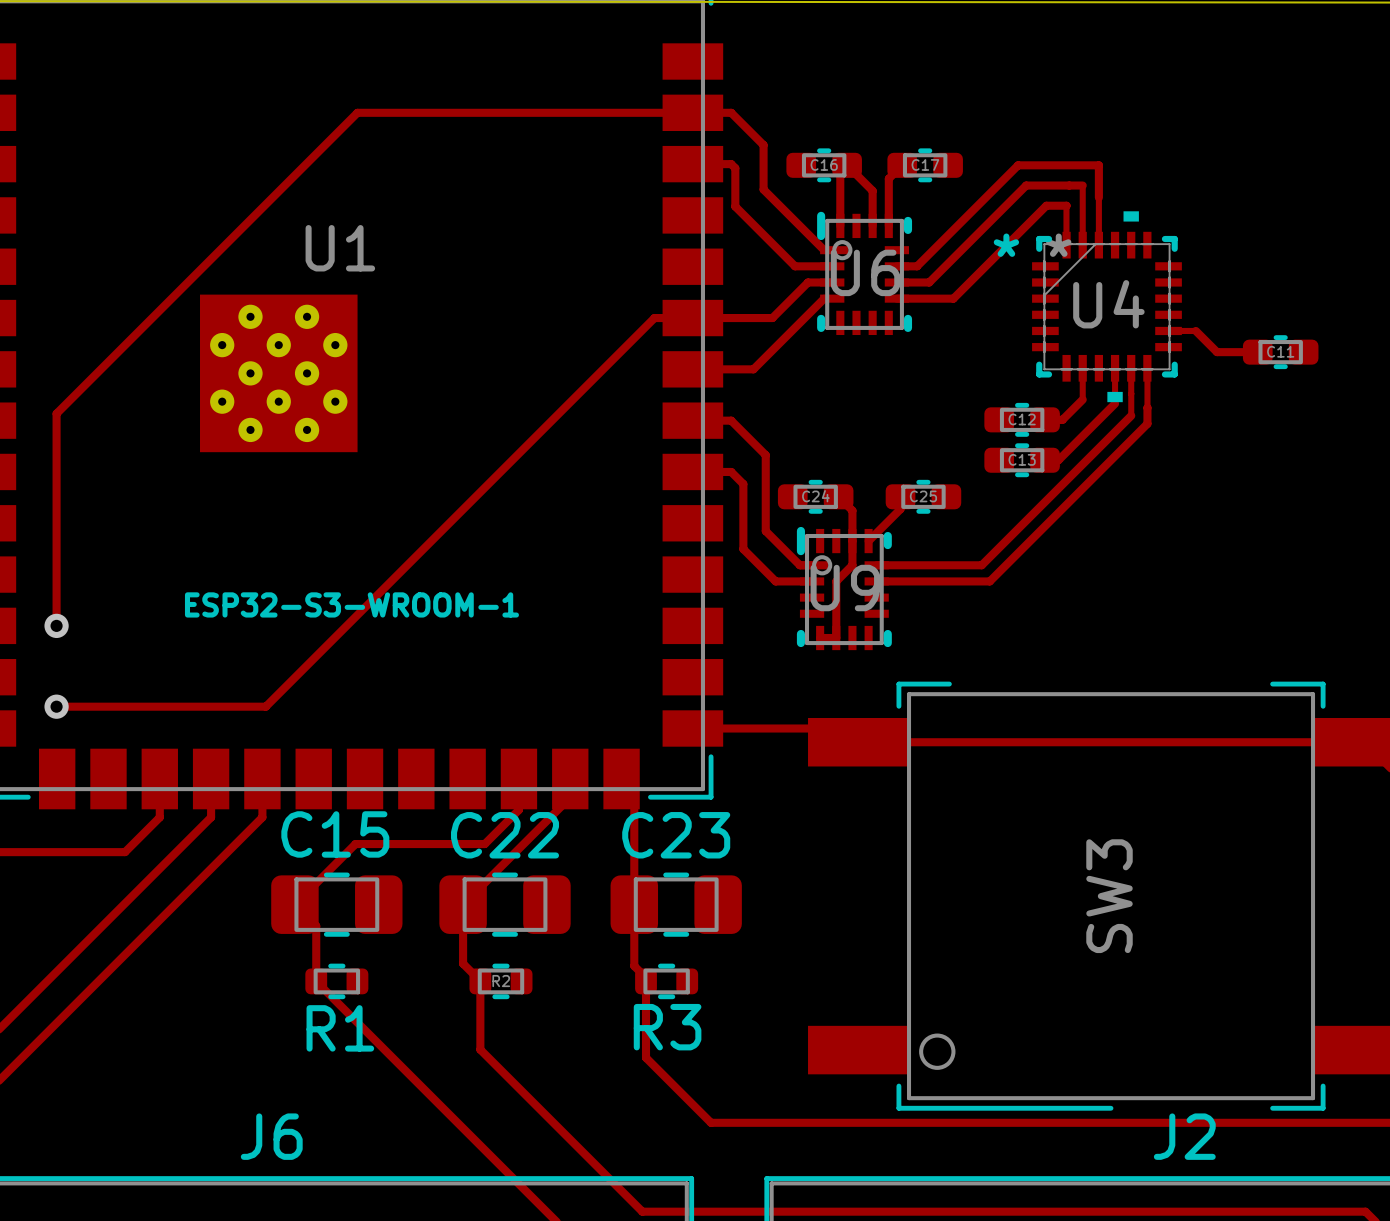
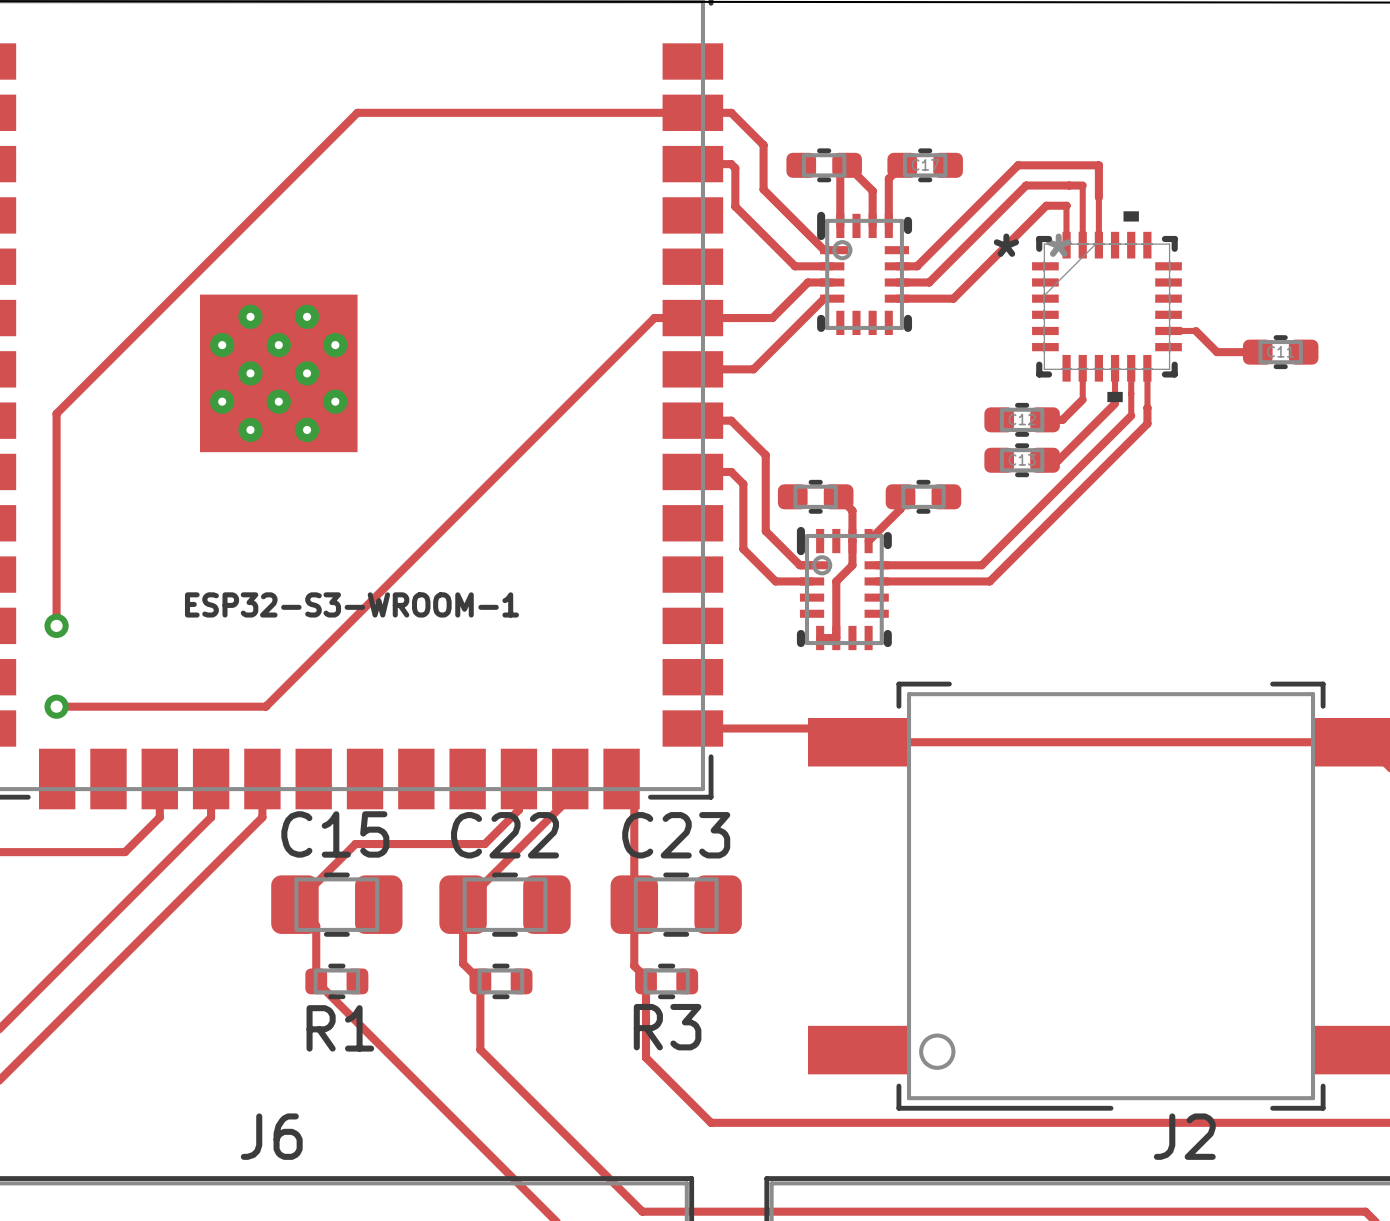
C16 name: C16 (824, 164) -> none
U1 name: U1 (340, 248) -> none
U6 name: U6 (865, 272) -> none
U4 name: U4 (1108, 304) -> none
C24 name: C24 (815, 496) -> none
C25 name: C25 (923, 496) -> none
U9 name: U9 (845, 588) -> none
SW3 name: SW3 (1109, 896) -> none
R2 name: R2 (501, 981) -> none

